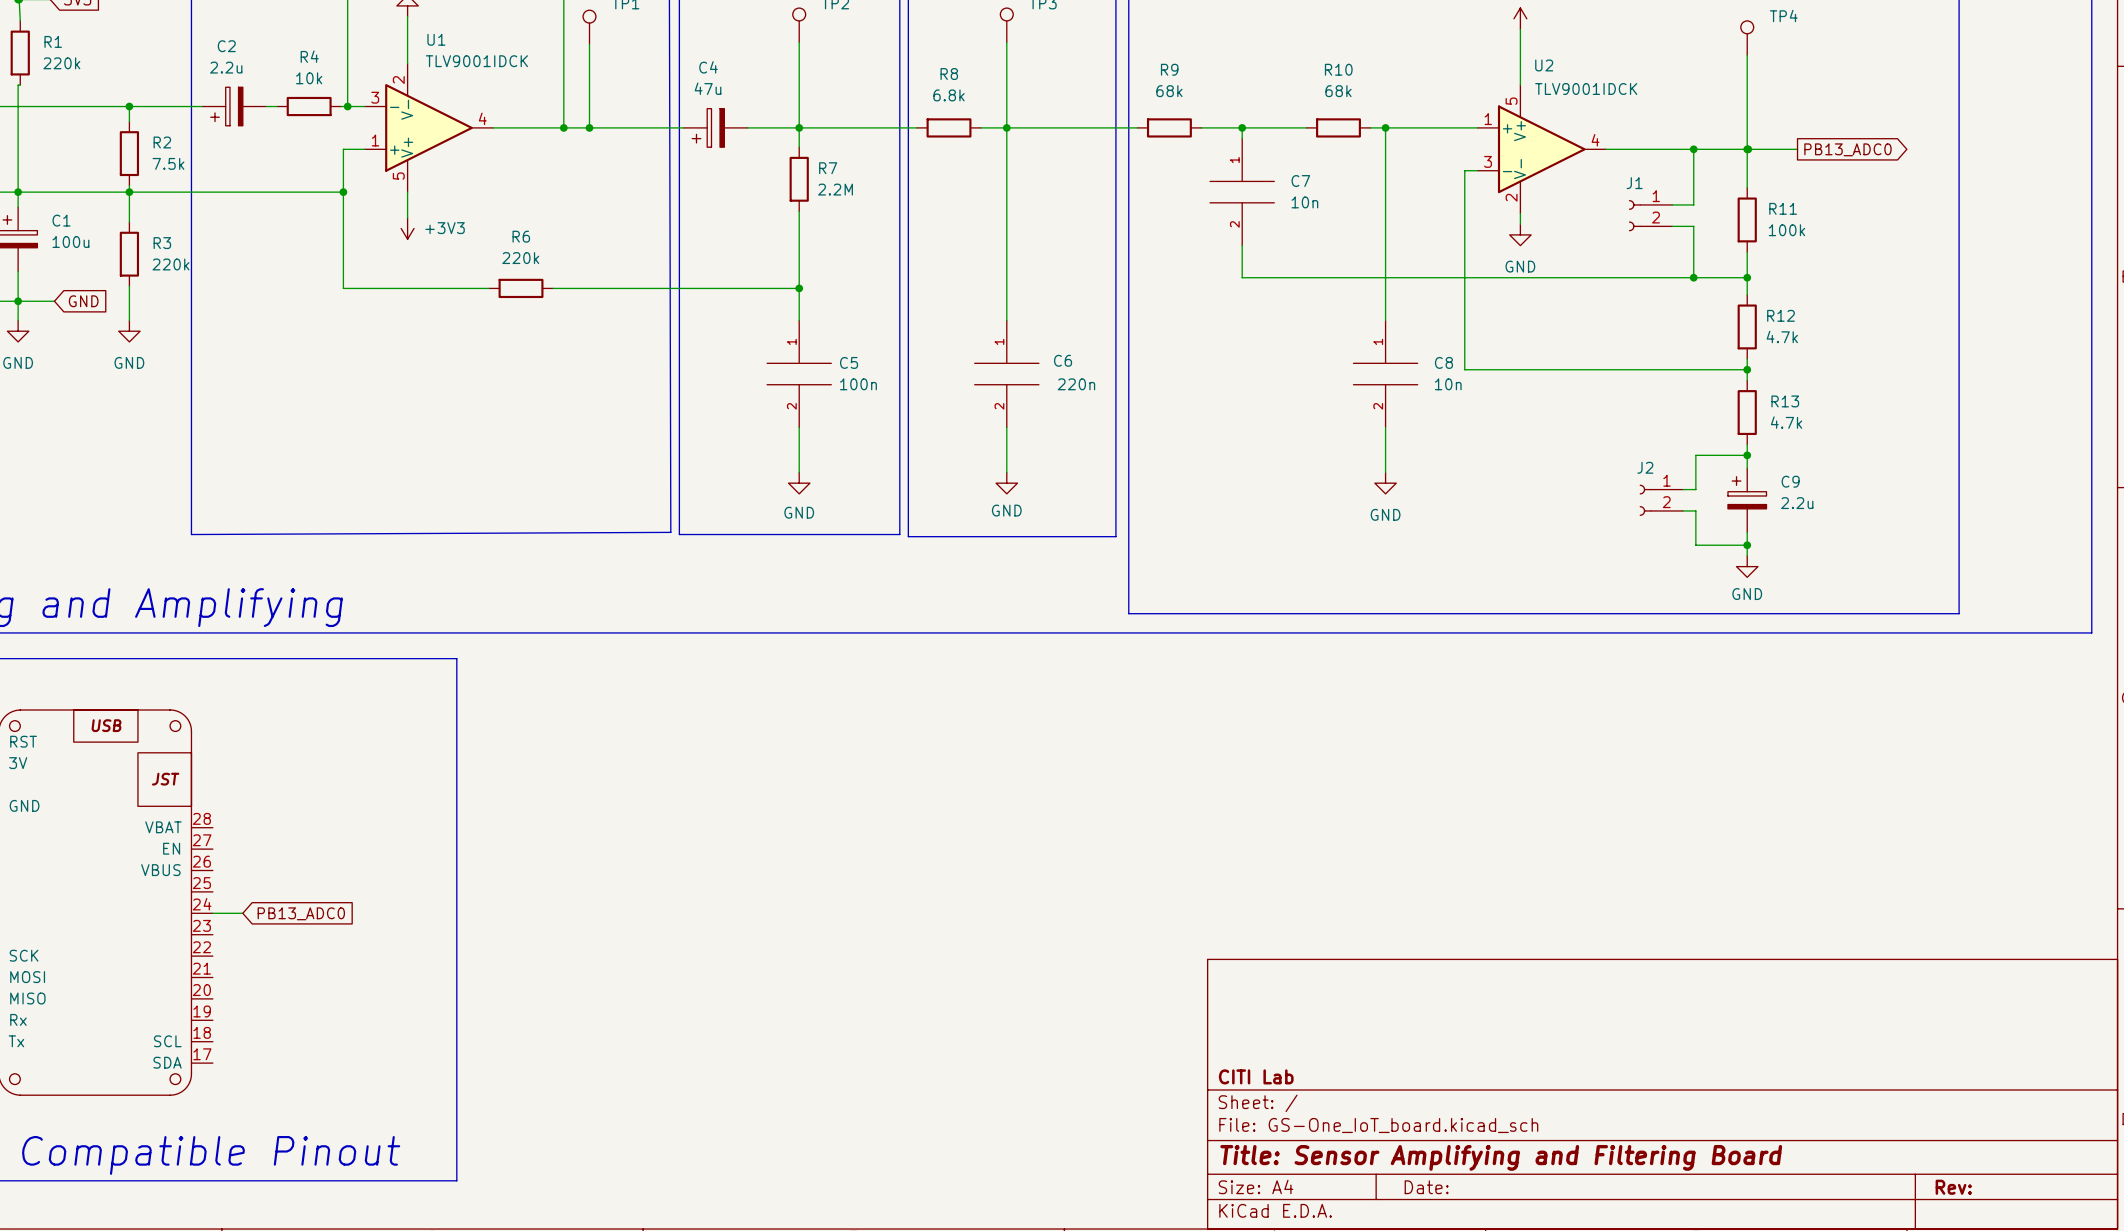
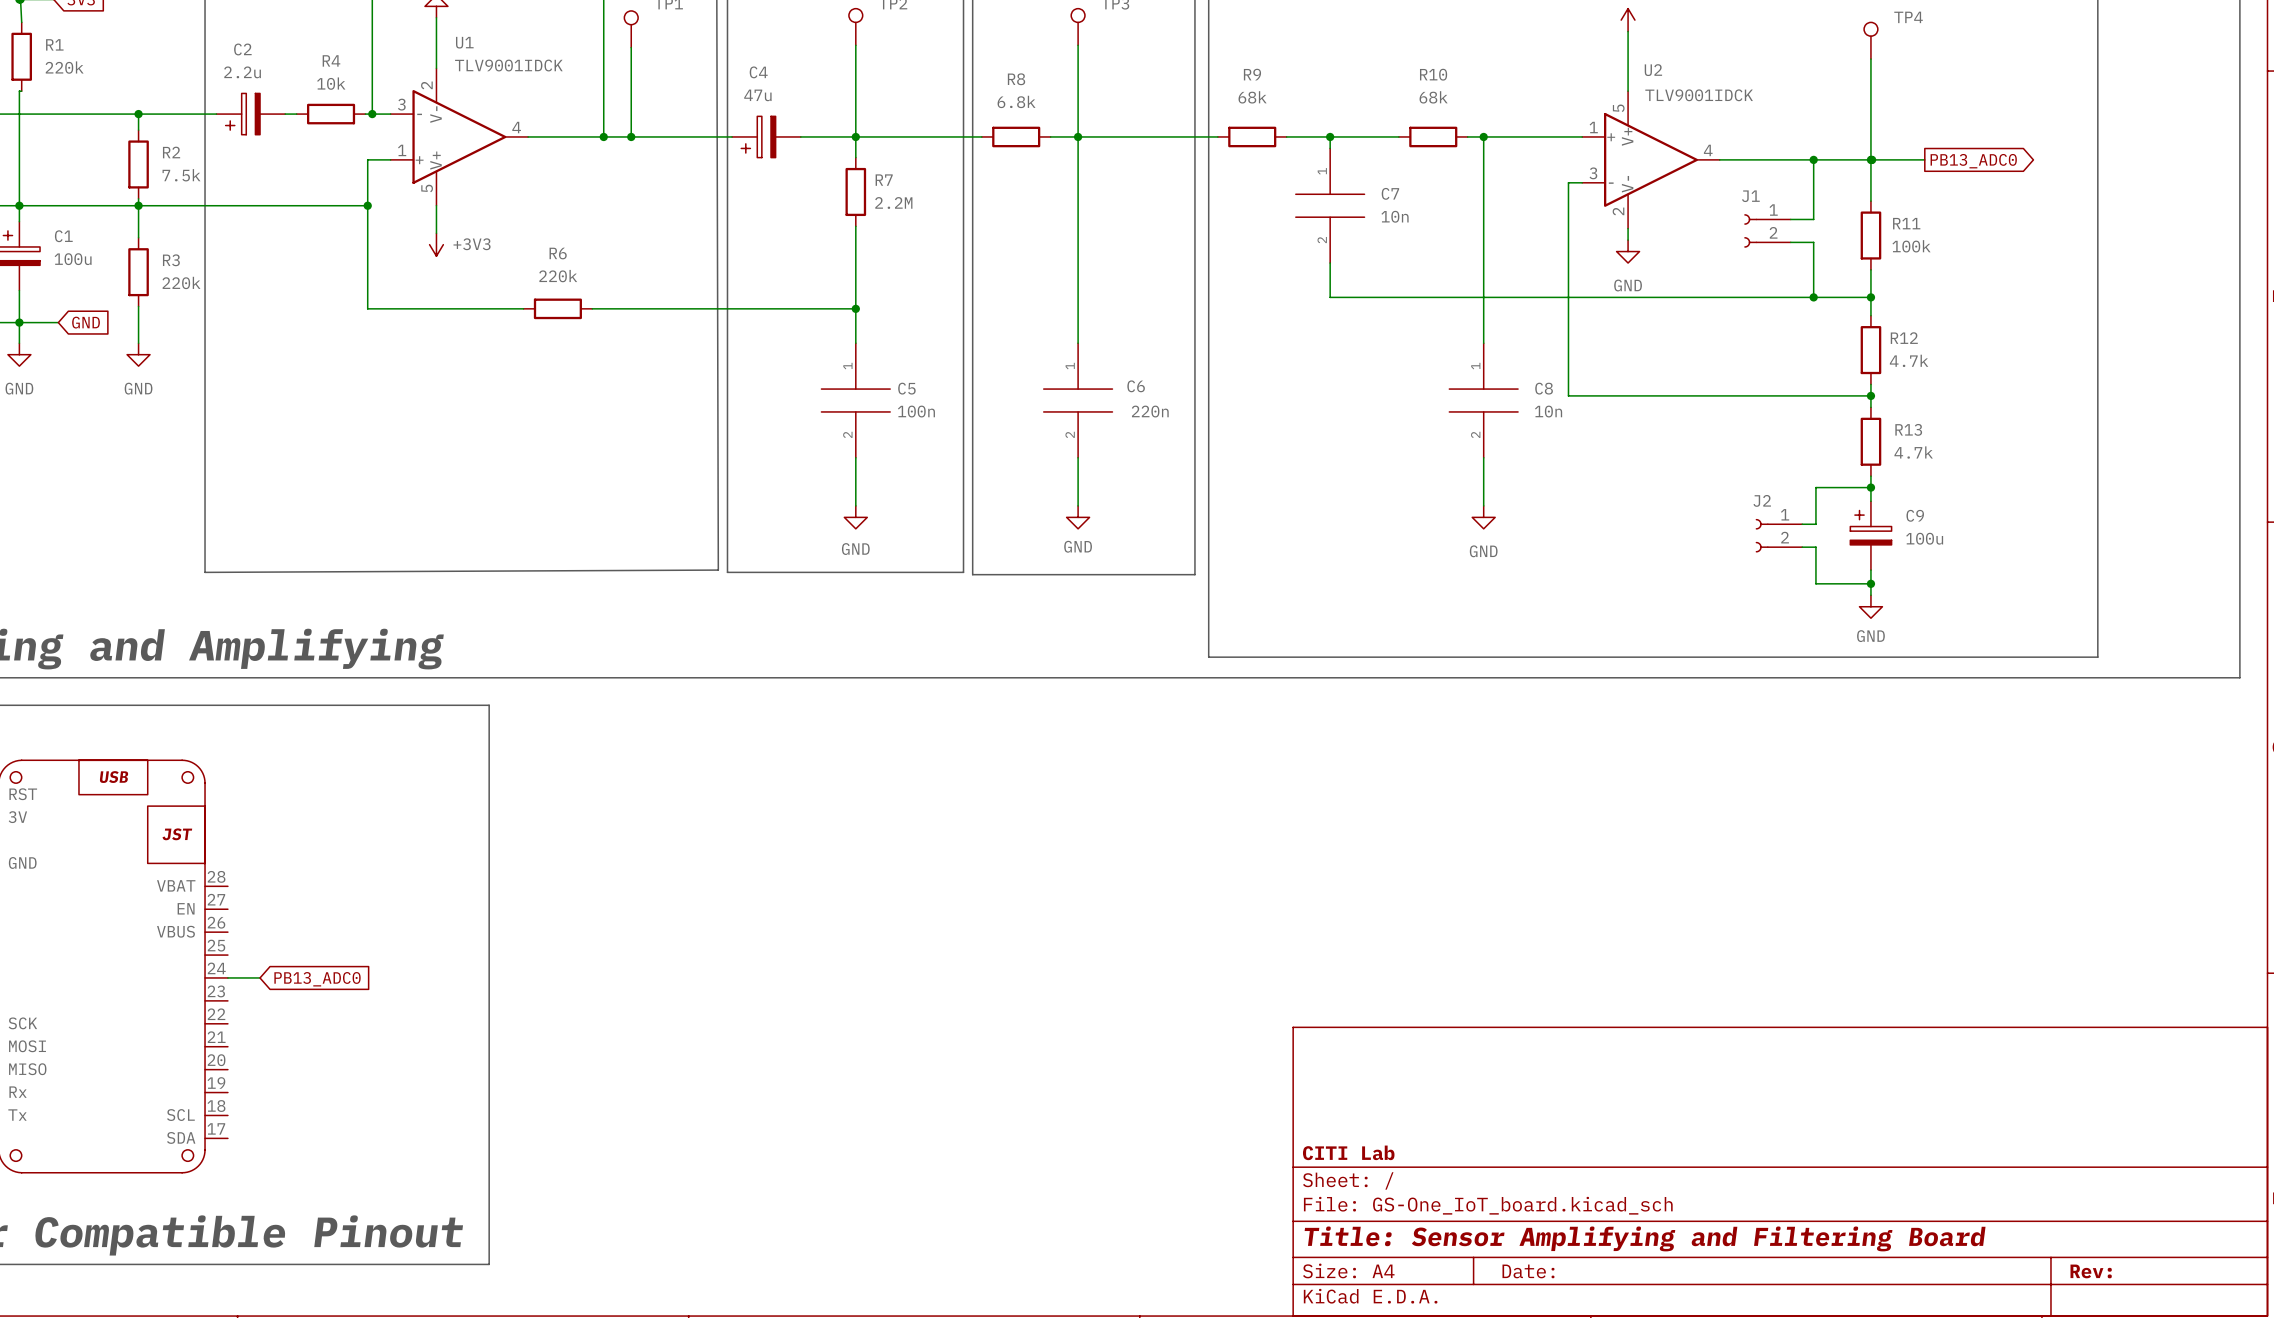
C9 value: 2.2u (1797, 503) -> 100u (1924, 538)

